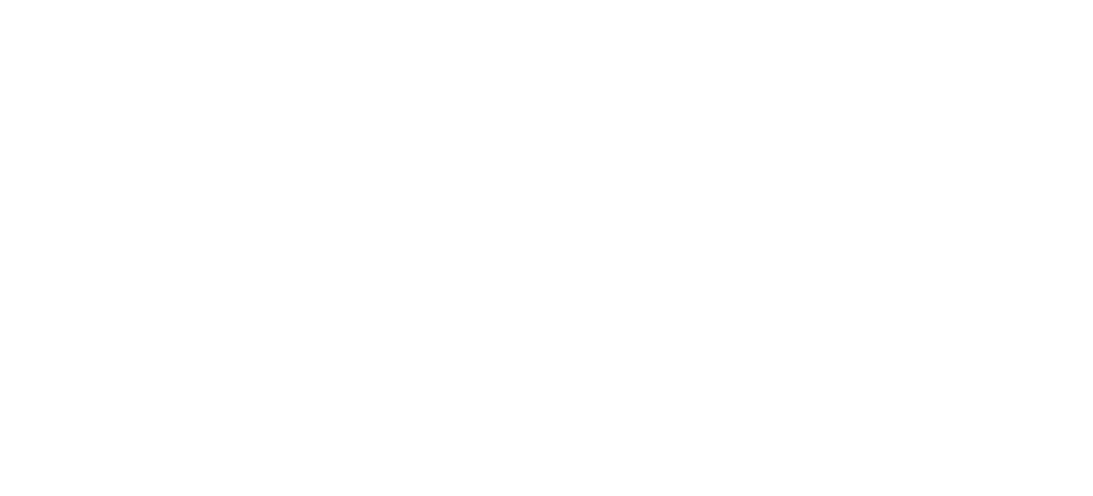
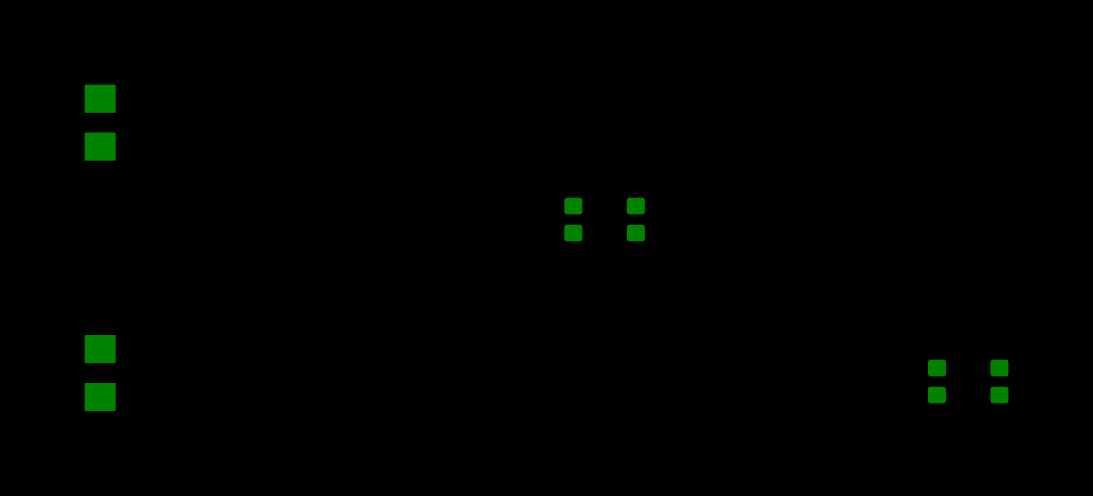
part: none -> (100, 122)
part: none -> (573, 219)
part: none -> (635, 219)
part: none -> (100, 373)
part: none -> (936, 381)
part: none -> (999, 381)

